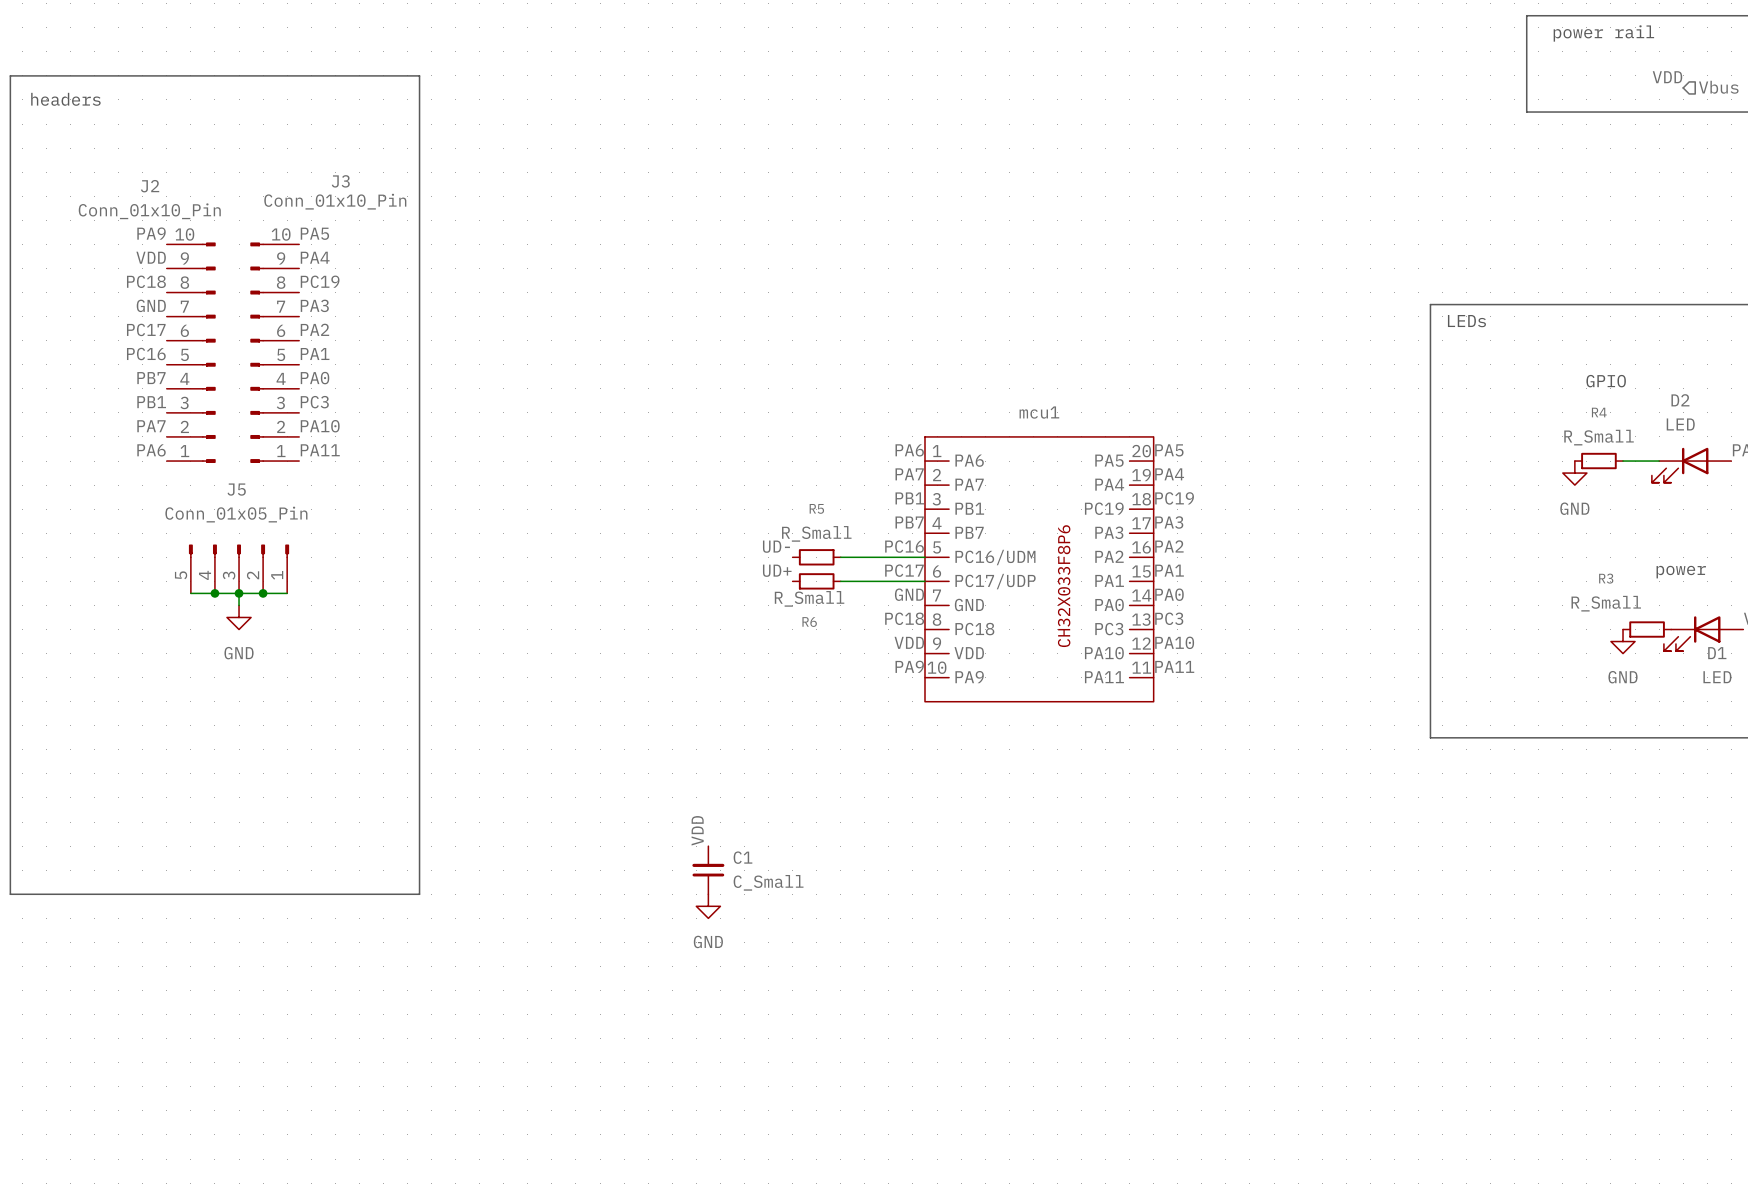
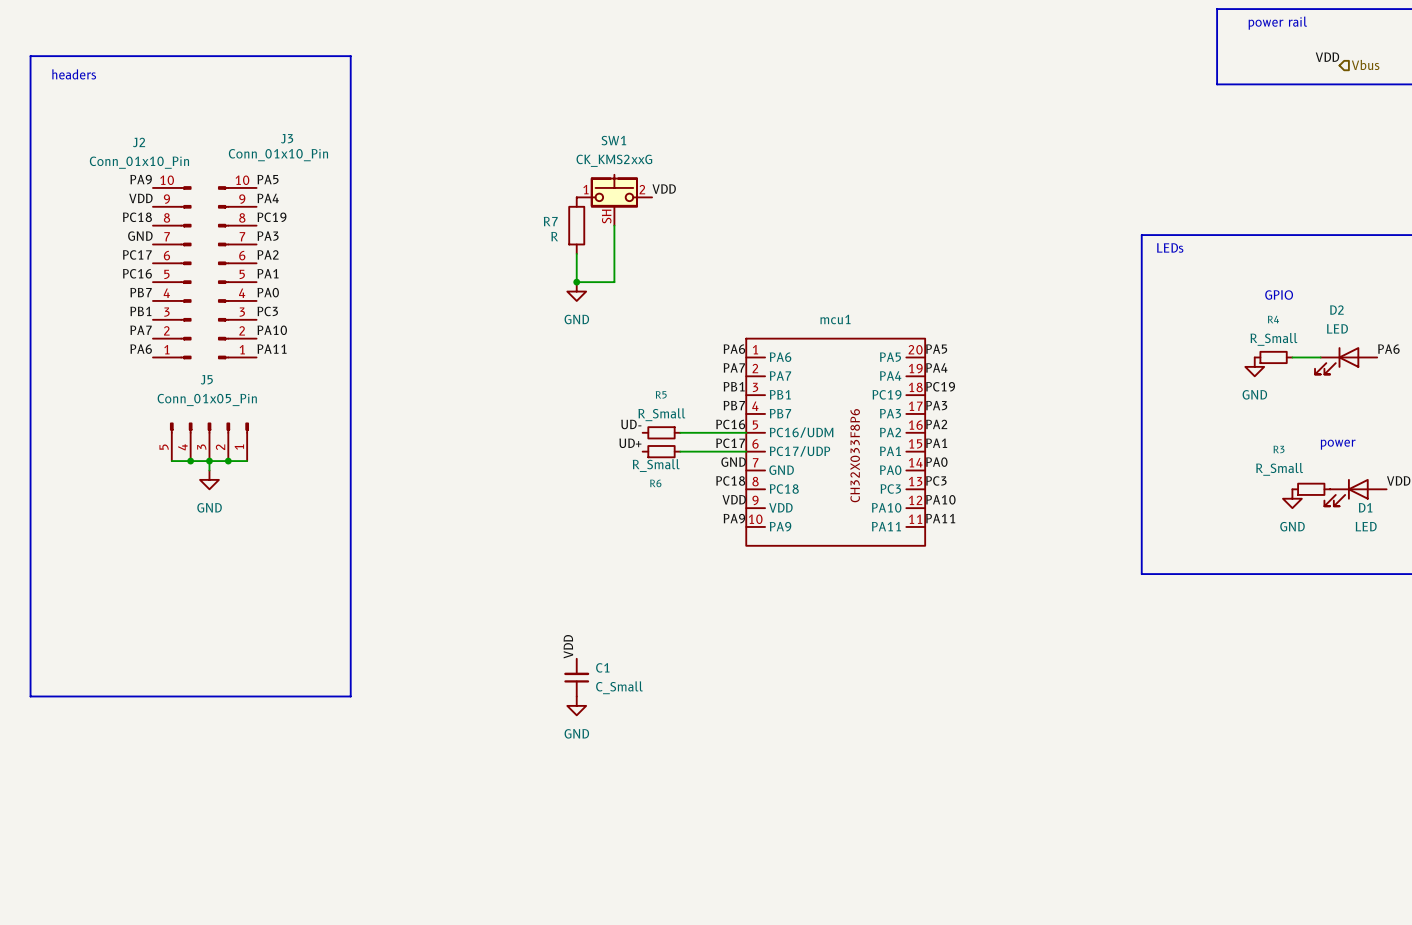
label: none -> VDD (664, 189)
SW1: none -> CK_KMS2xxG (614, 200)
R7: none -> R (576, 225)
wire: none -> (614, 225) (614, 282) (576, 282) (576, 253)
junction: none -> (576, 282)
power symbol: none -> GND (576, 291)

